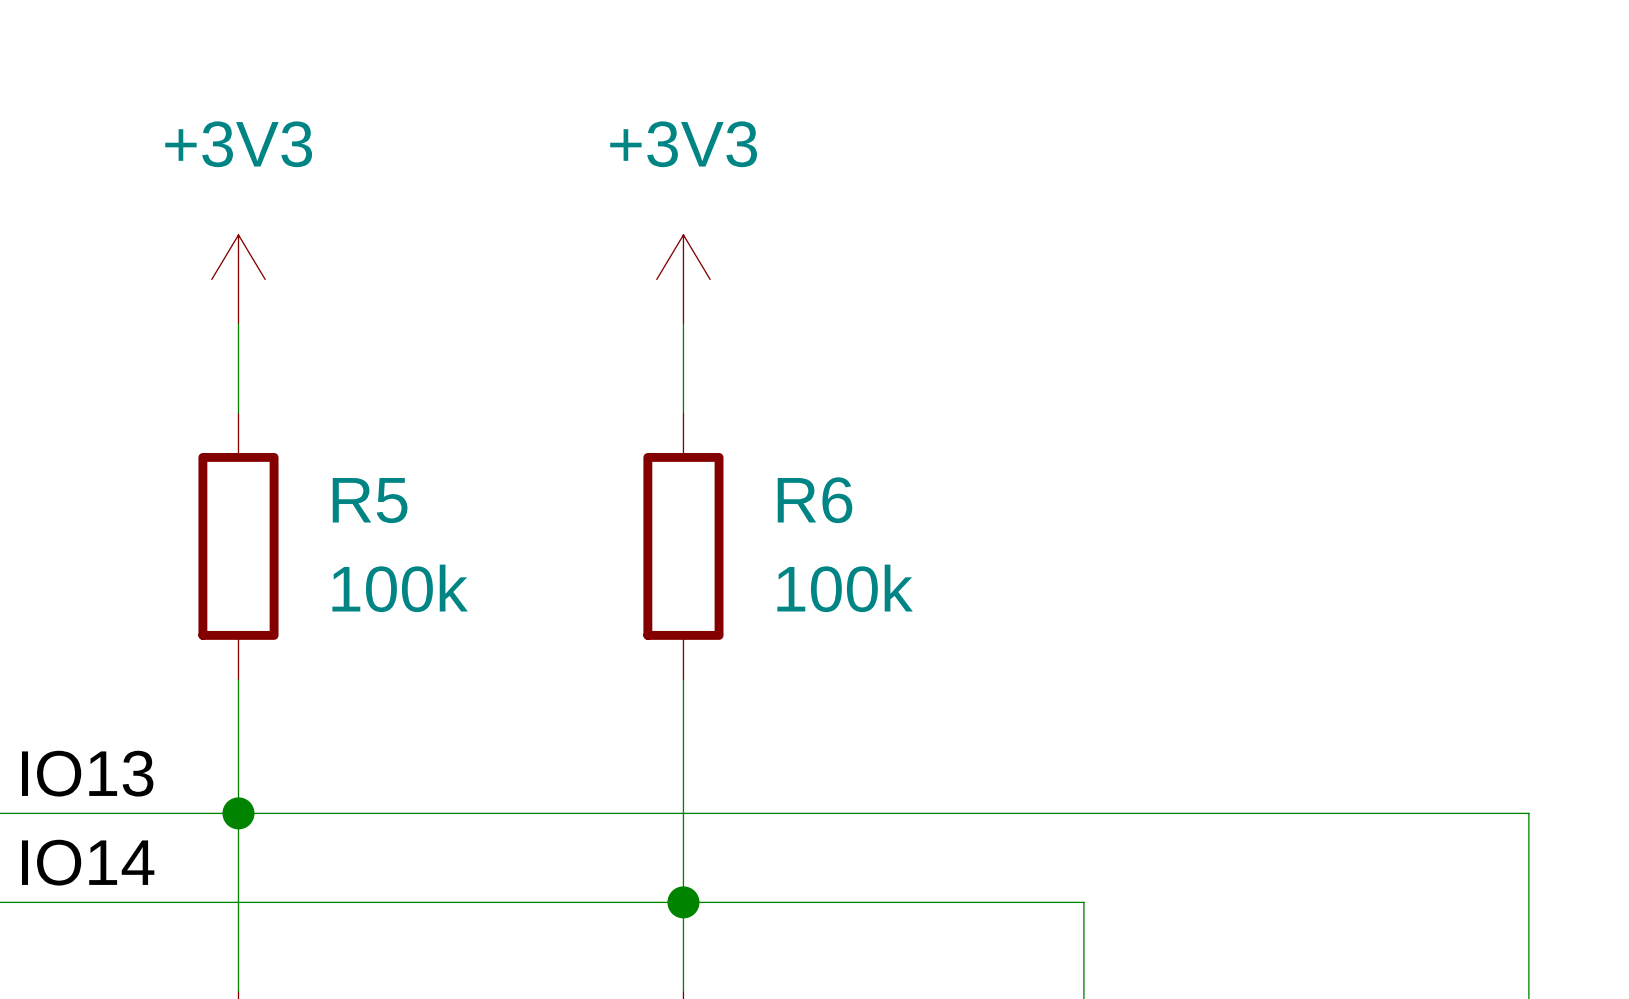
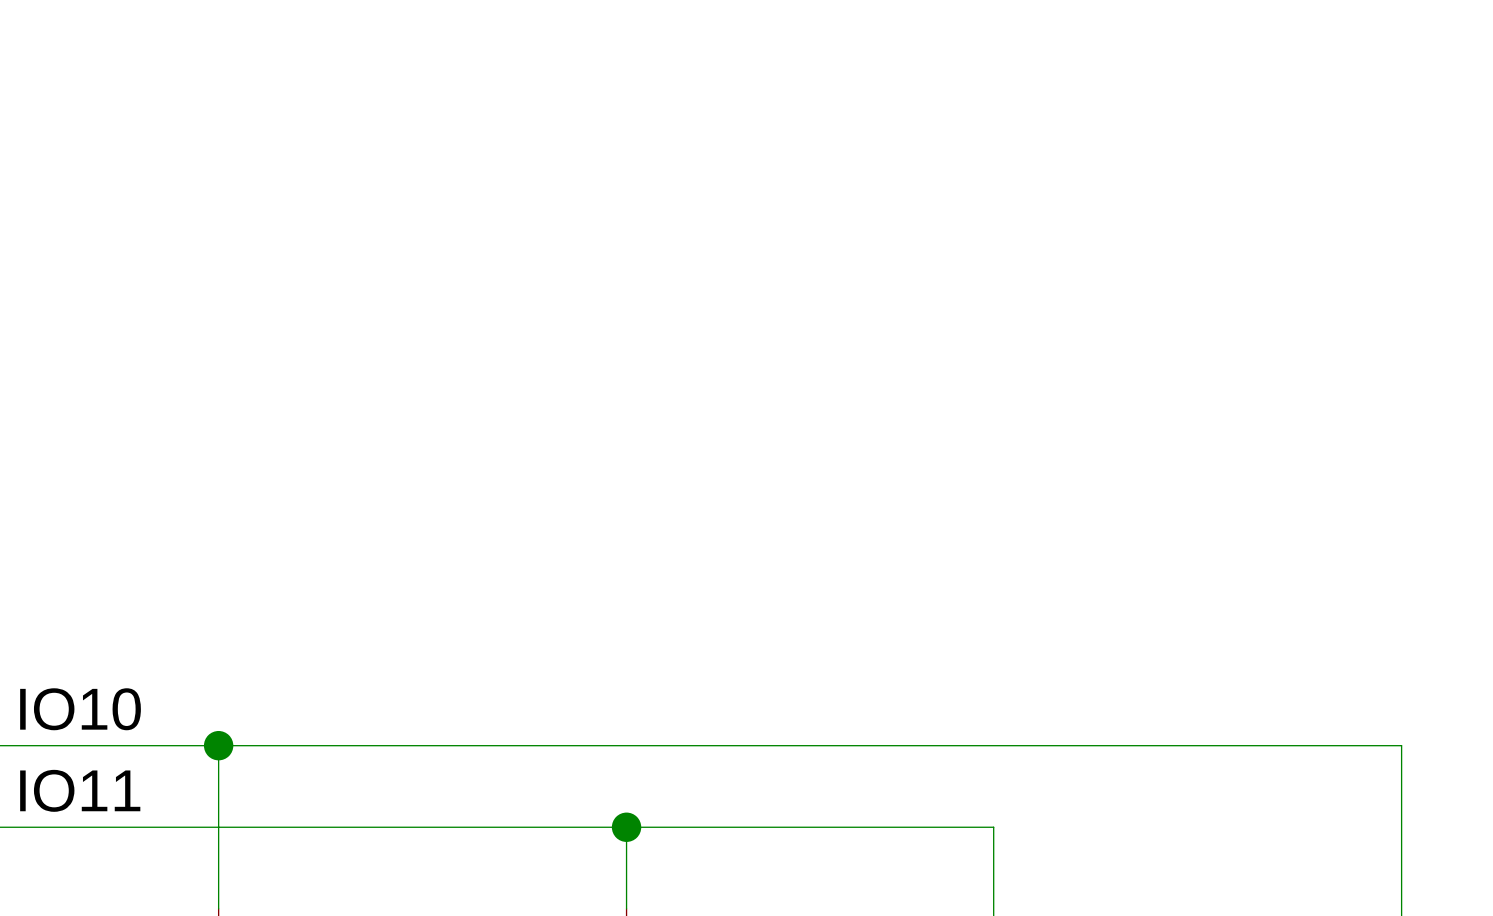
power symbol: +3V3 (238, 279) -> none
power symbol: +3V3 (683, 279) -> none
wire: (238, 323) (238, 412) -> none
wire: (683, 323) (683, 412) -> none
R5: 100k (238, 546) -> none
R6: 100k (683, 546) -> none
wire: (238, 679) (238, 813) -> none
wire: (683, 679) (683, 902) -> none
label: IO13 (87, 773) -> IO10 (80, 709)
label: IO14 (88, 862) -> IO11 (80, 790)

